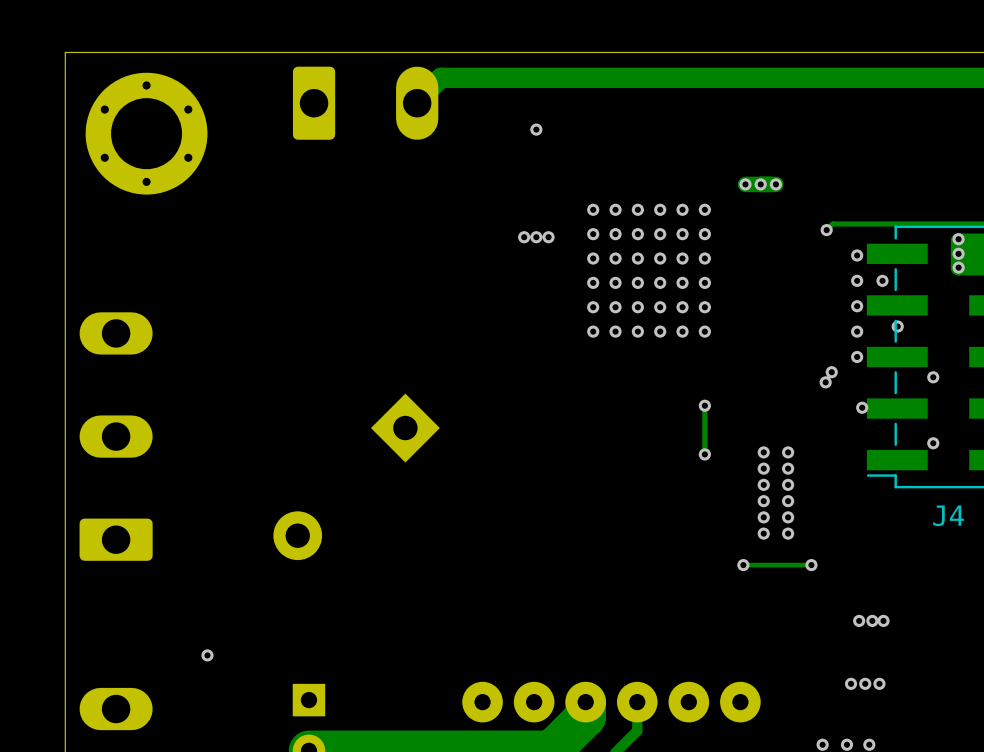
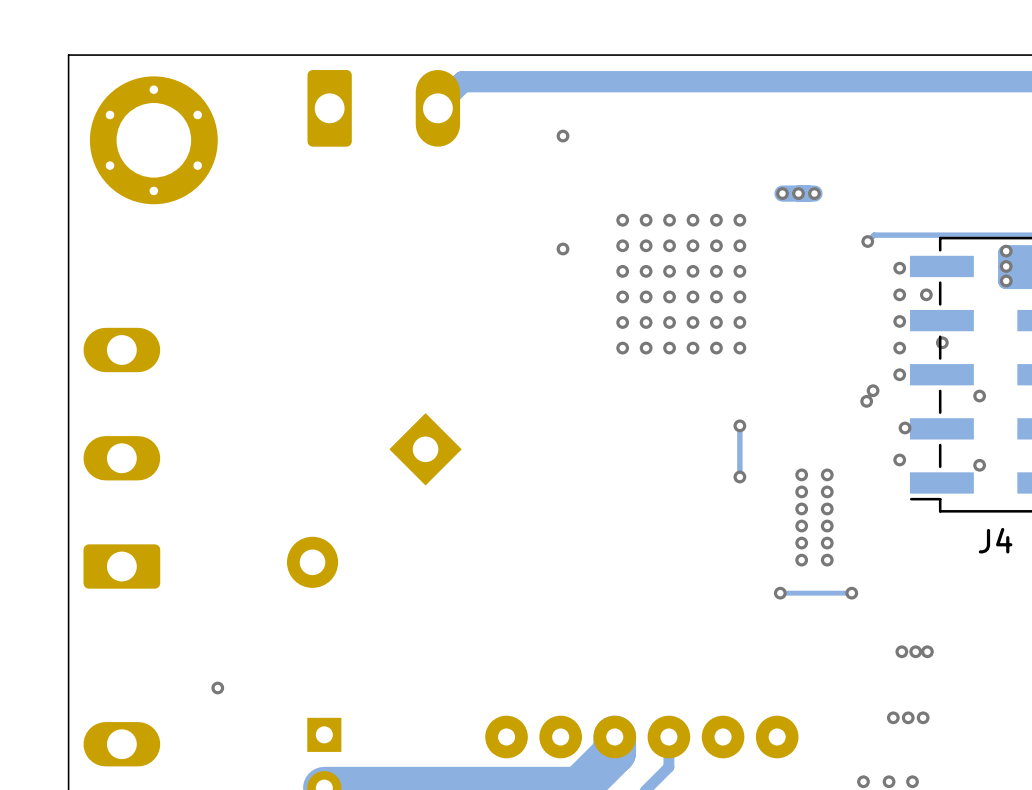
via: (524, 237) -> none
via: (548, 237) -> none
via: none -> (899, 459)

